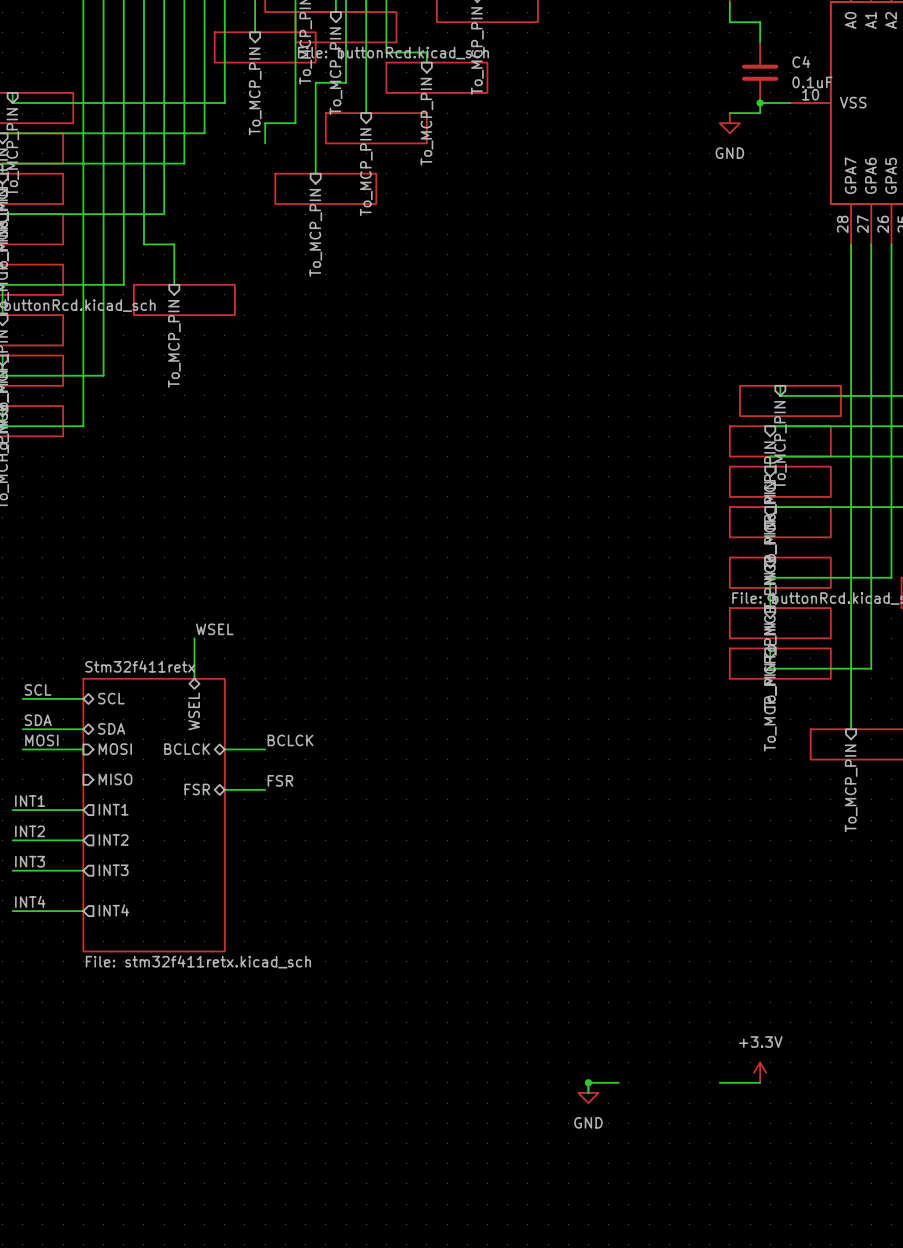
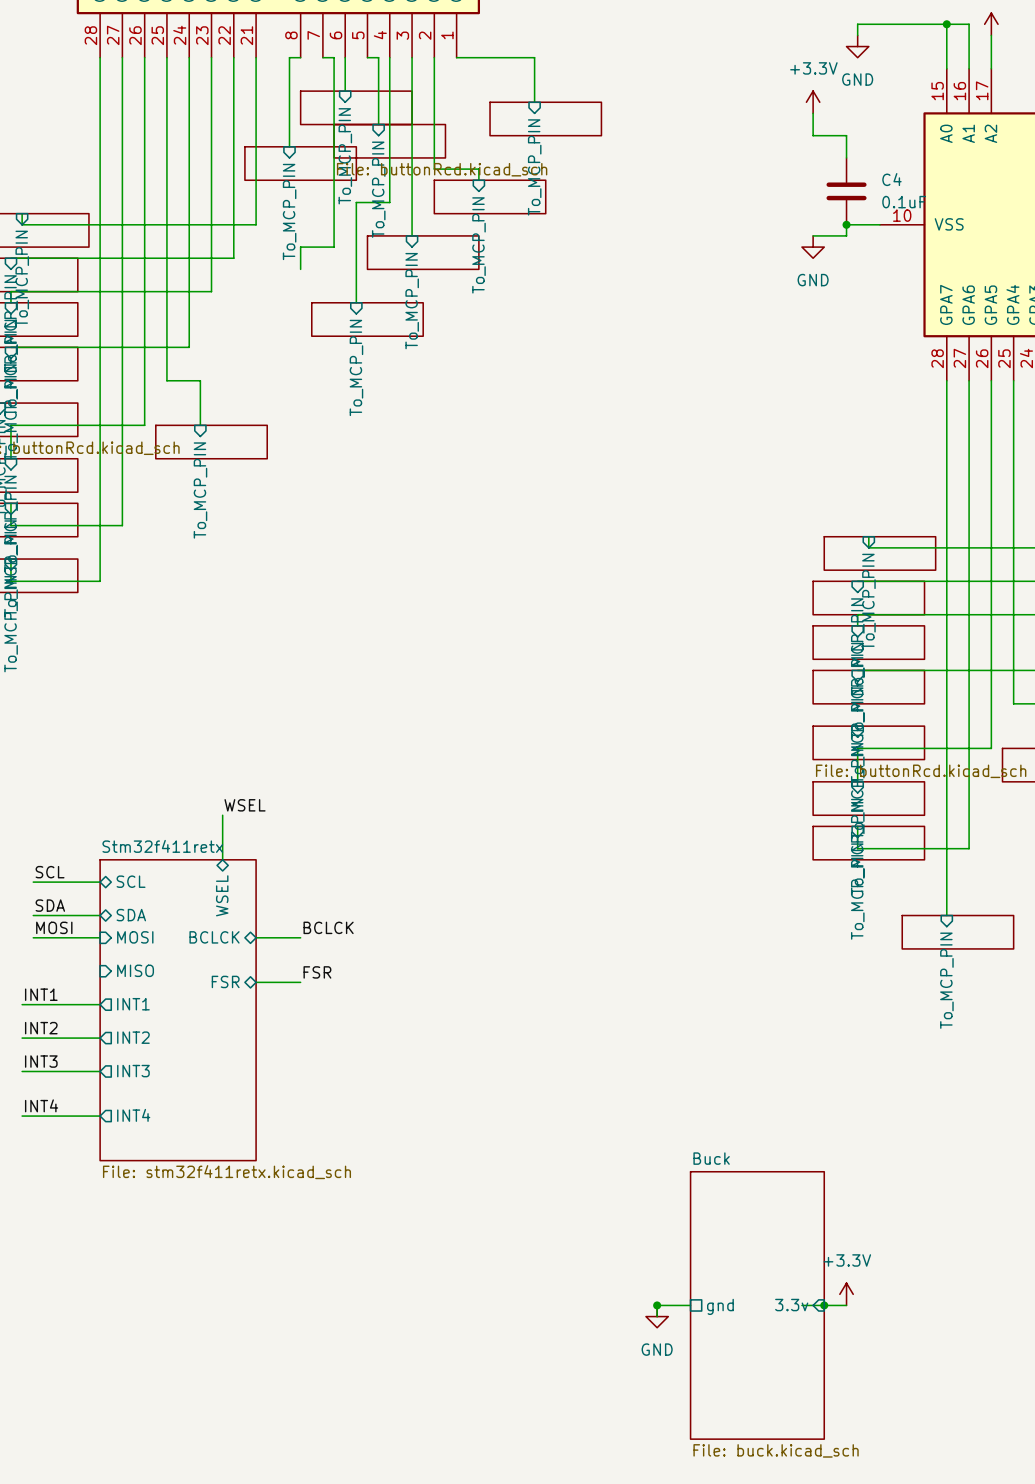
sheet Buck: none -> File: buck.kicad_sch (757, 1305)
sheet pin: none -> 3.3v (791, 1305)
junction: none -> (824, 1305)
sheet pin: none -> gnd (720, 1306)

